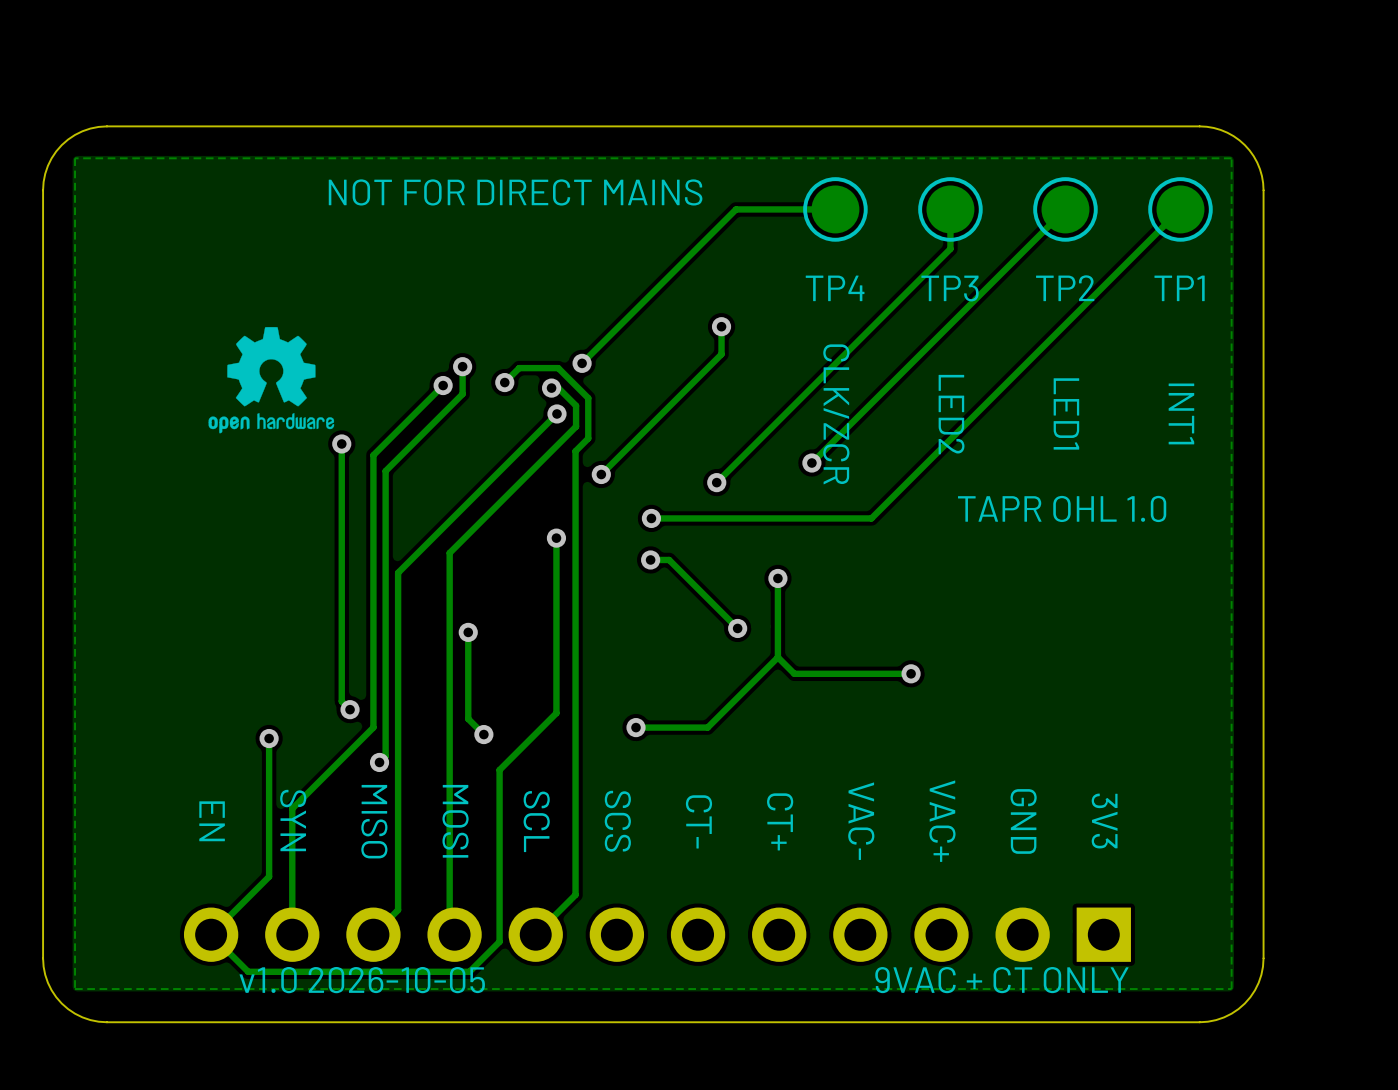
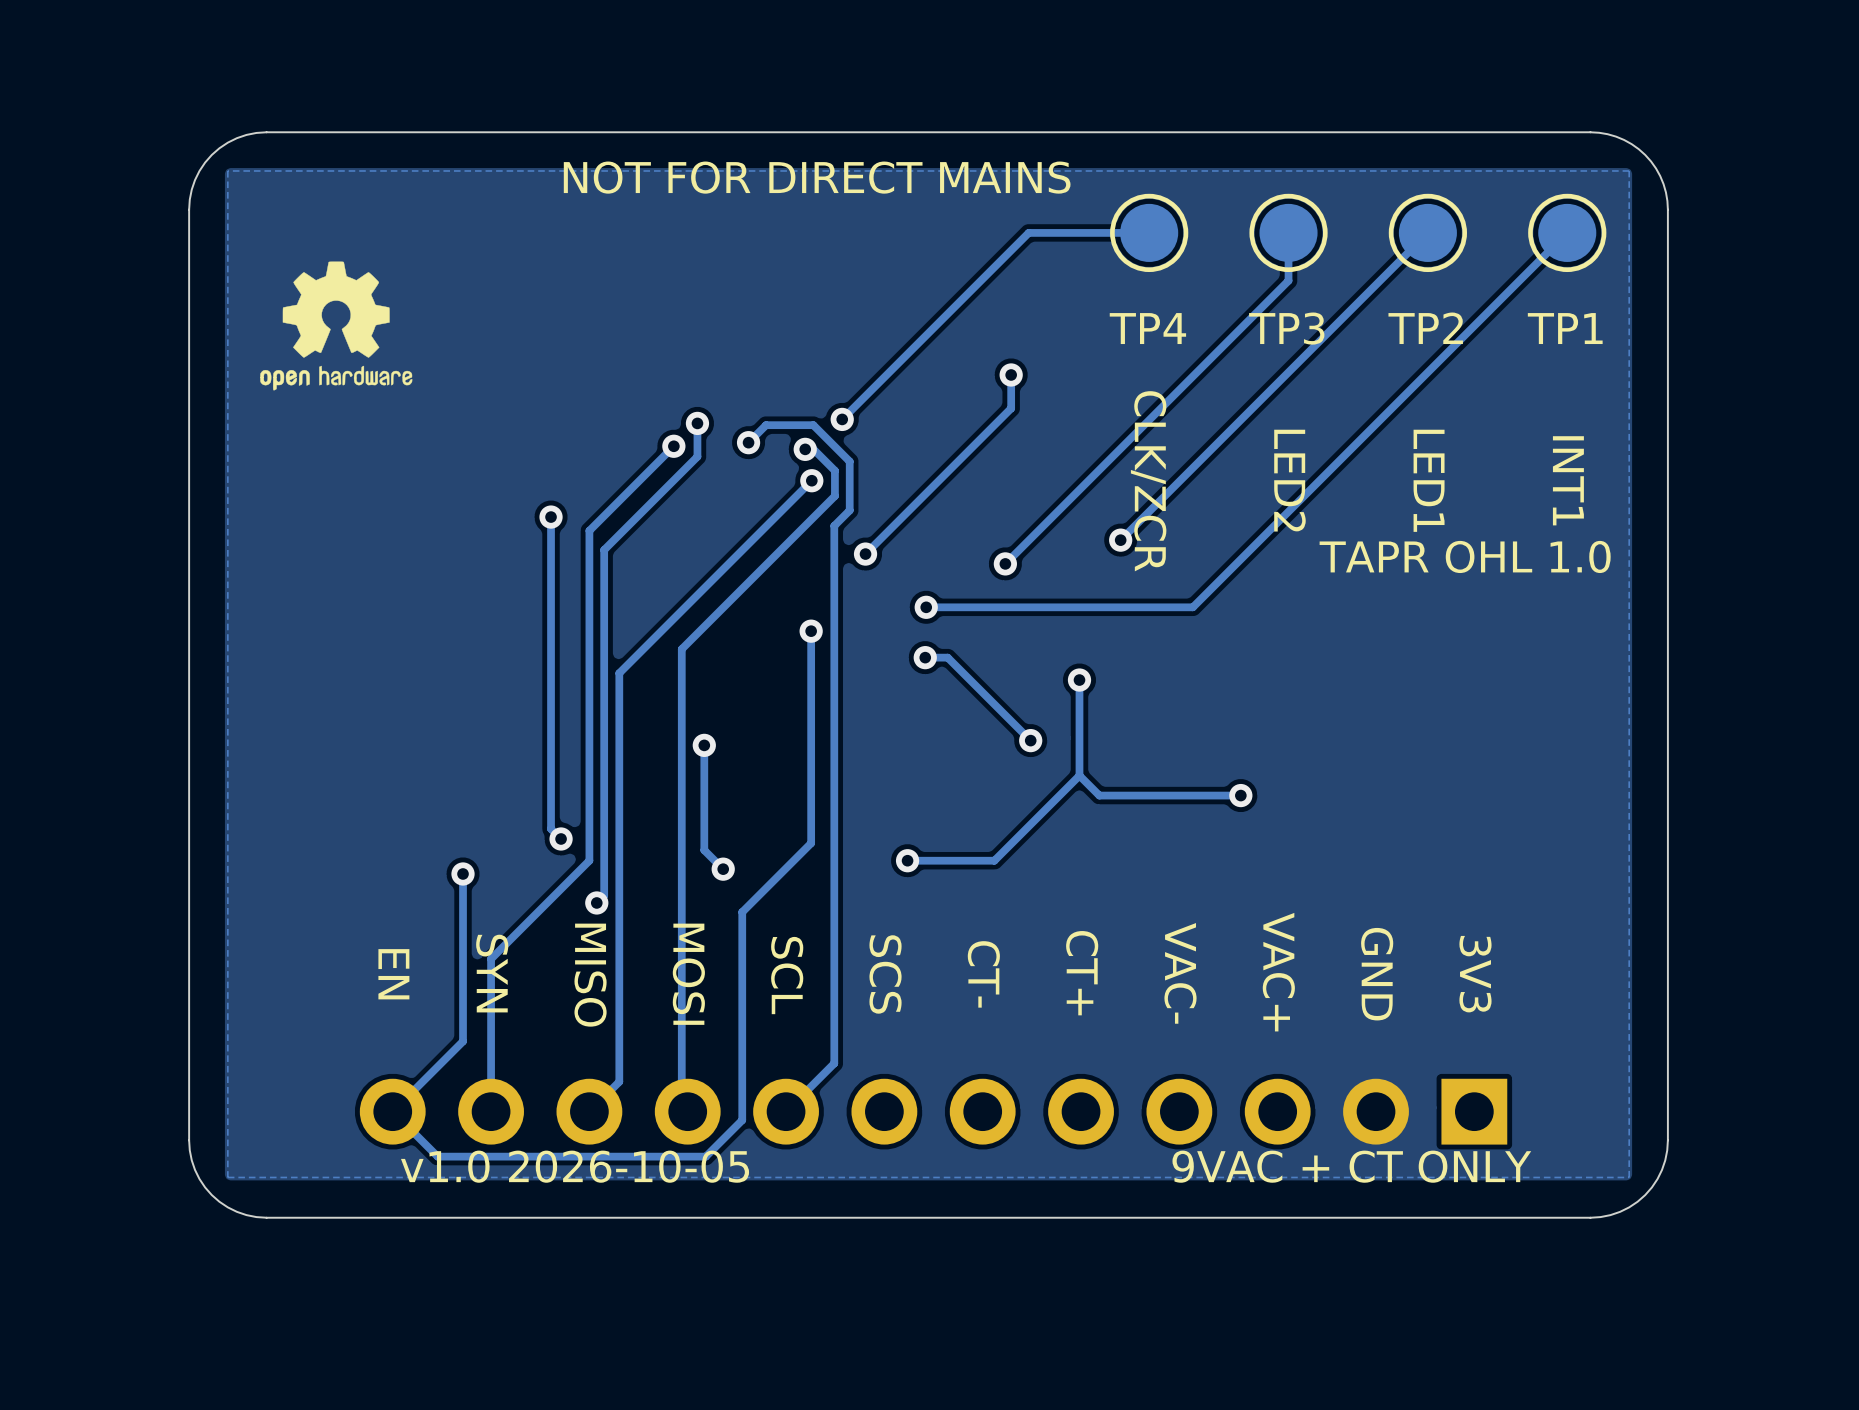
text position: NOT FOR DIRECT MAINS (515, 192) -> NOT FOR DIRECT MAINS (817, 177)
drawing position: (271, 380) -> (336, 325)
text position: TAPR OHL 1.0 (1062, 508) -> TAPR OHL 1.0 (1465, 556)

